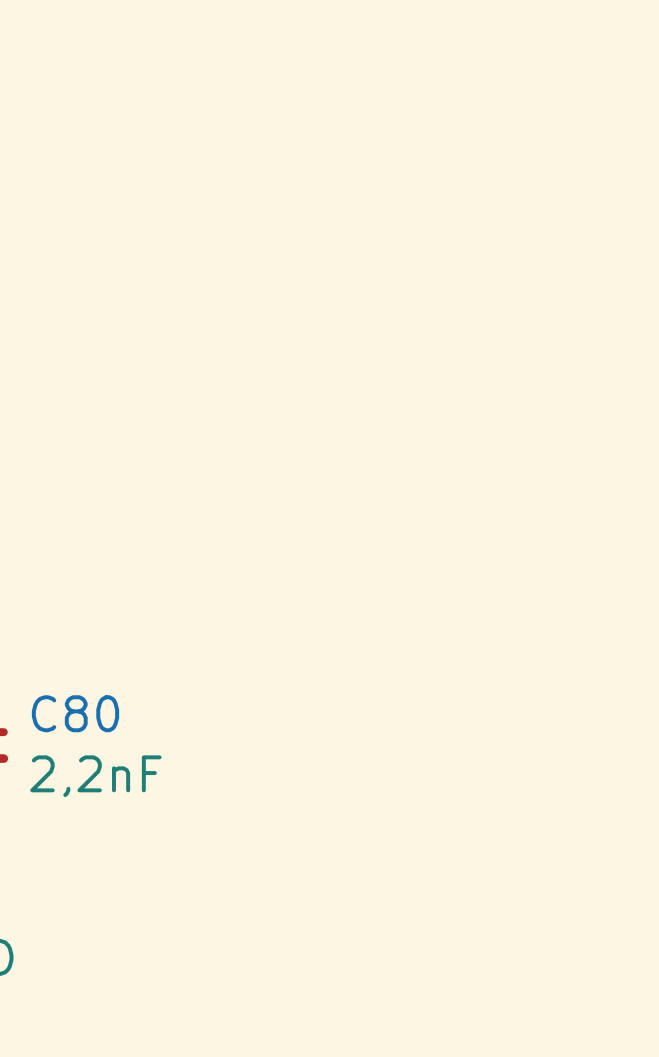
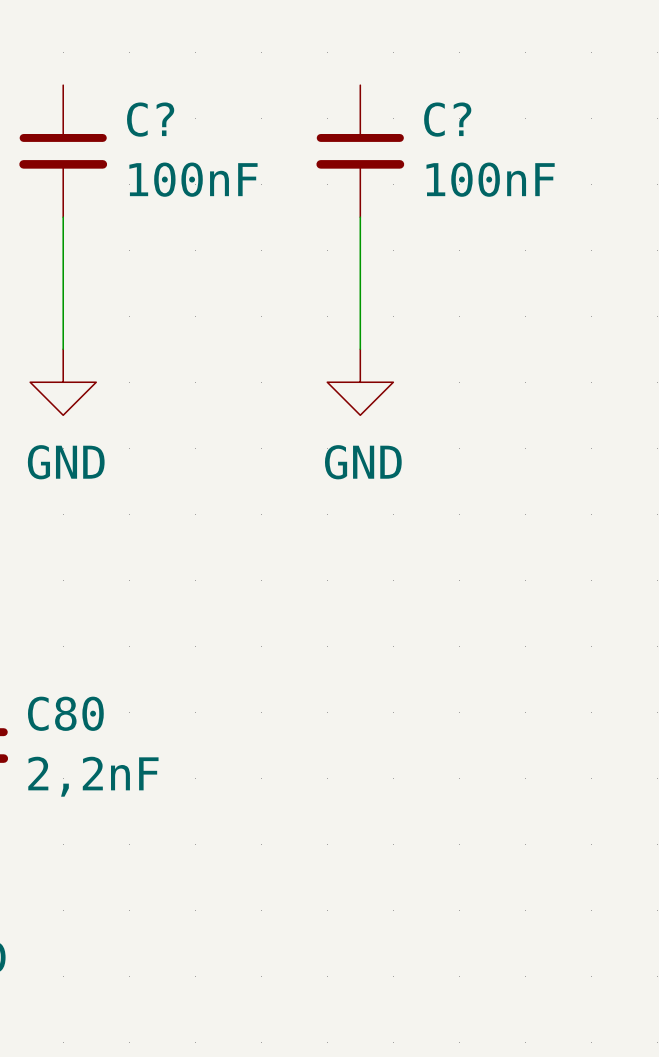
C?: none -> 100nF (63, 151)
C?: none -> 100nF (360, 151)
wire: none -> (63, 217) (63, 349)
wire: none -> (360, 217) (360, 349)
power symbol: none -> GND (63, 382)
power symbol: none -> GND (360, 382)

